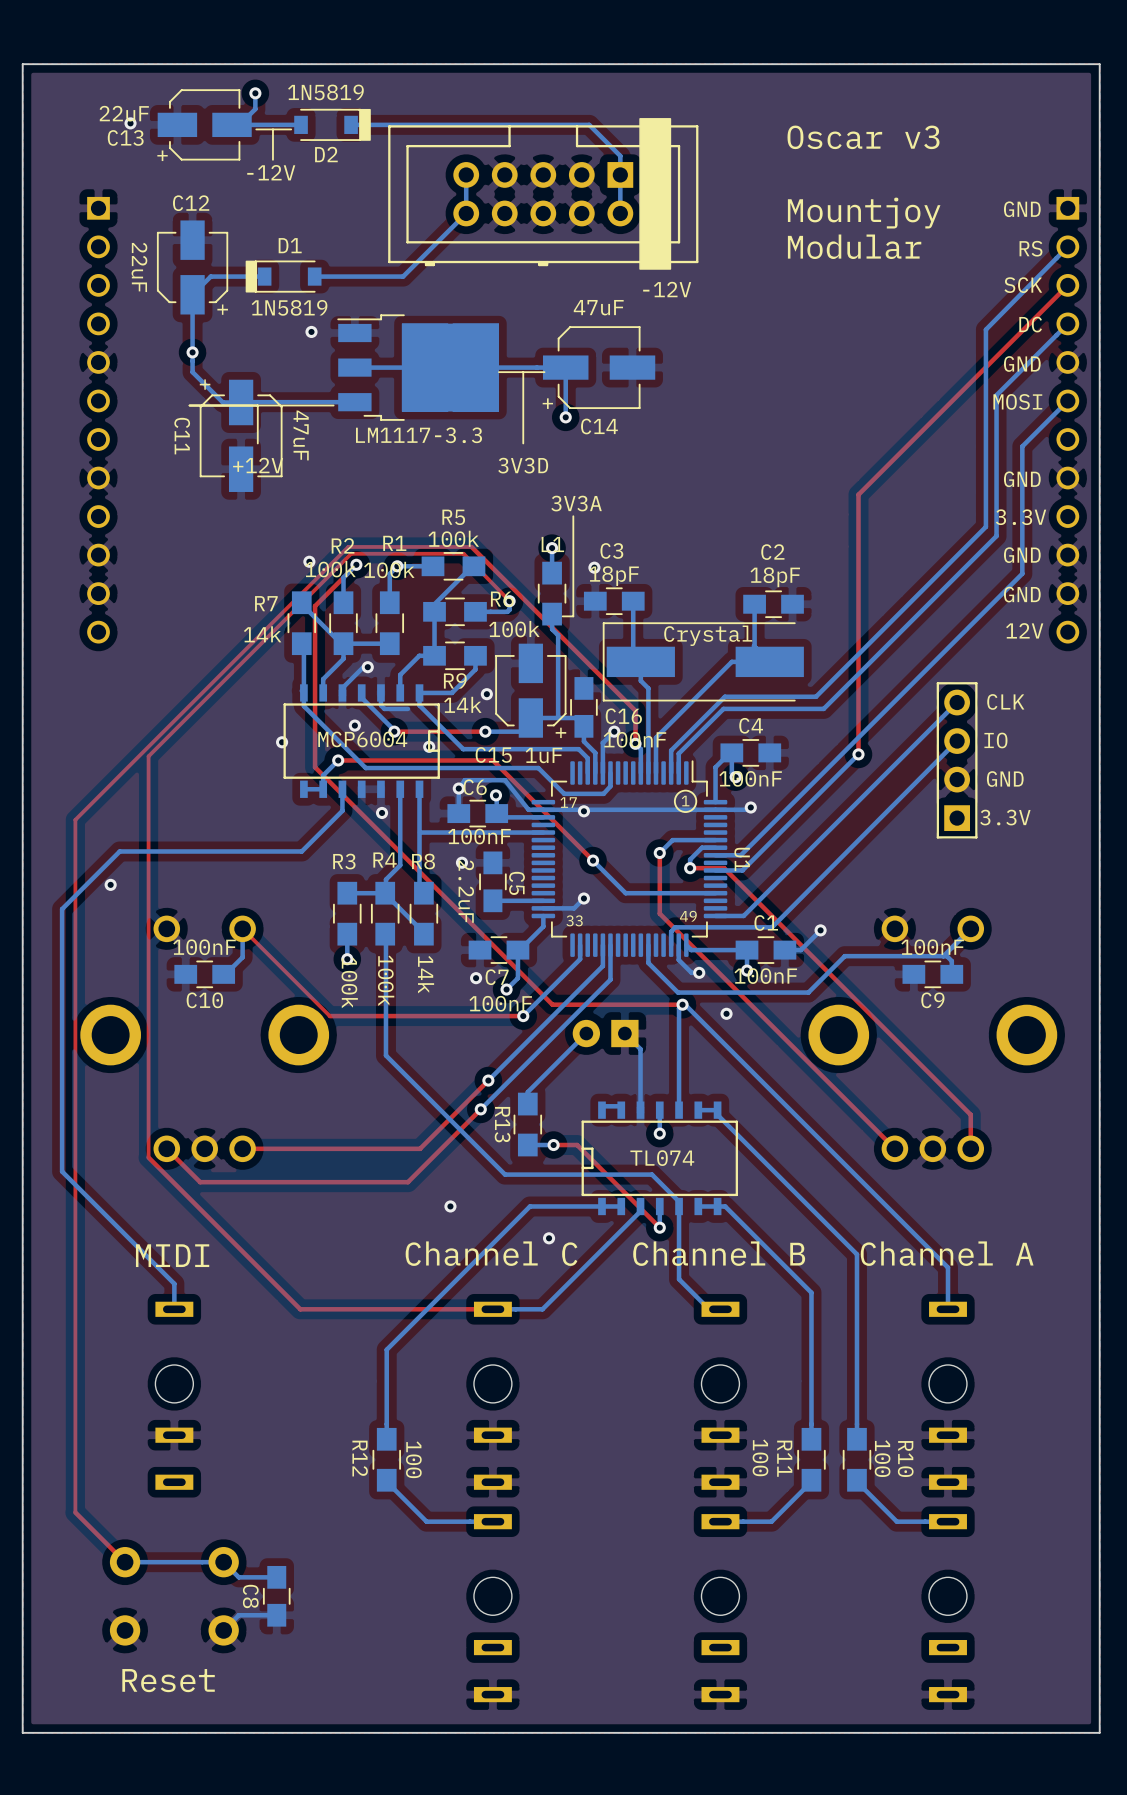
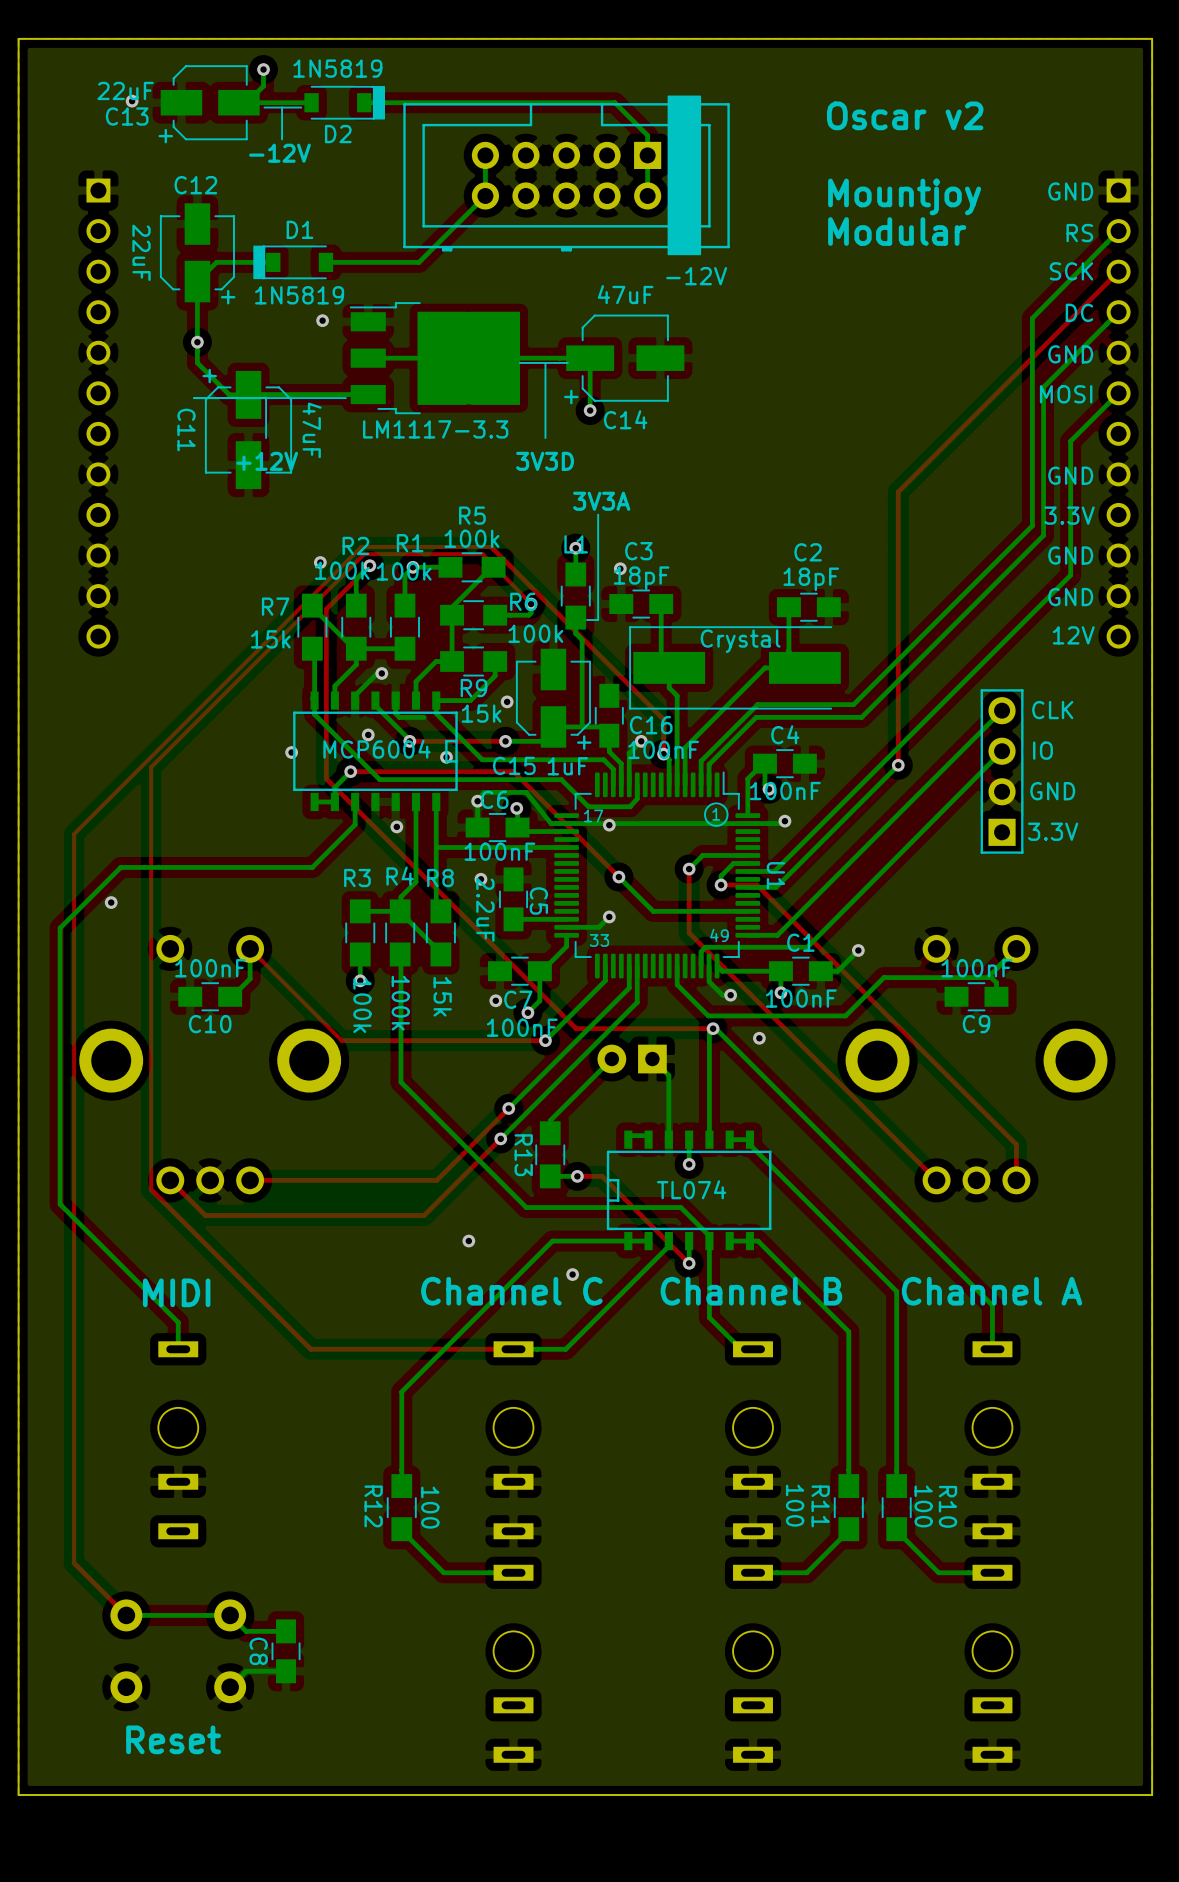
text: Oscar v3 (863, 137) -> Oscar v2 (905, 115)
R7 value: 14k (262, 634) -> 15k (270, 639)
R9 value: 14k (462, 704) -> 15k (481, 713)
R8 value: 14k (426, 974) -> 15k (442, 996)

